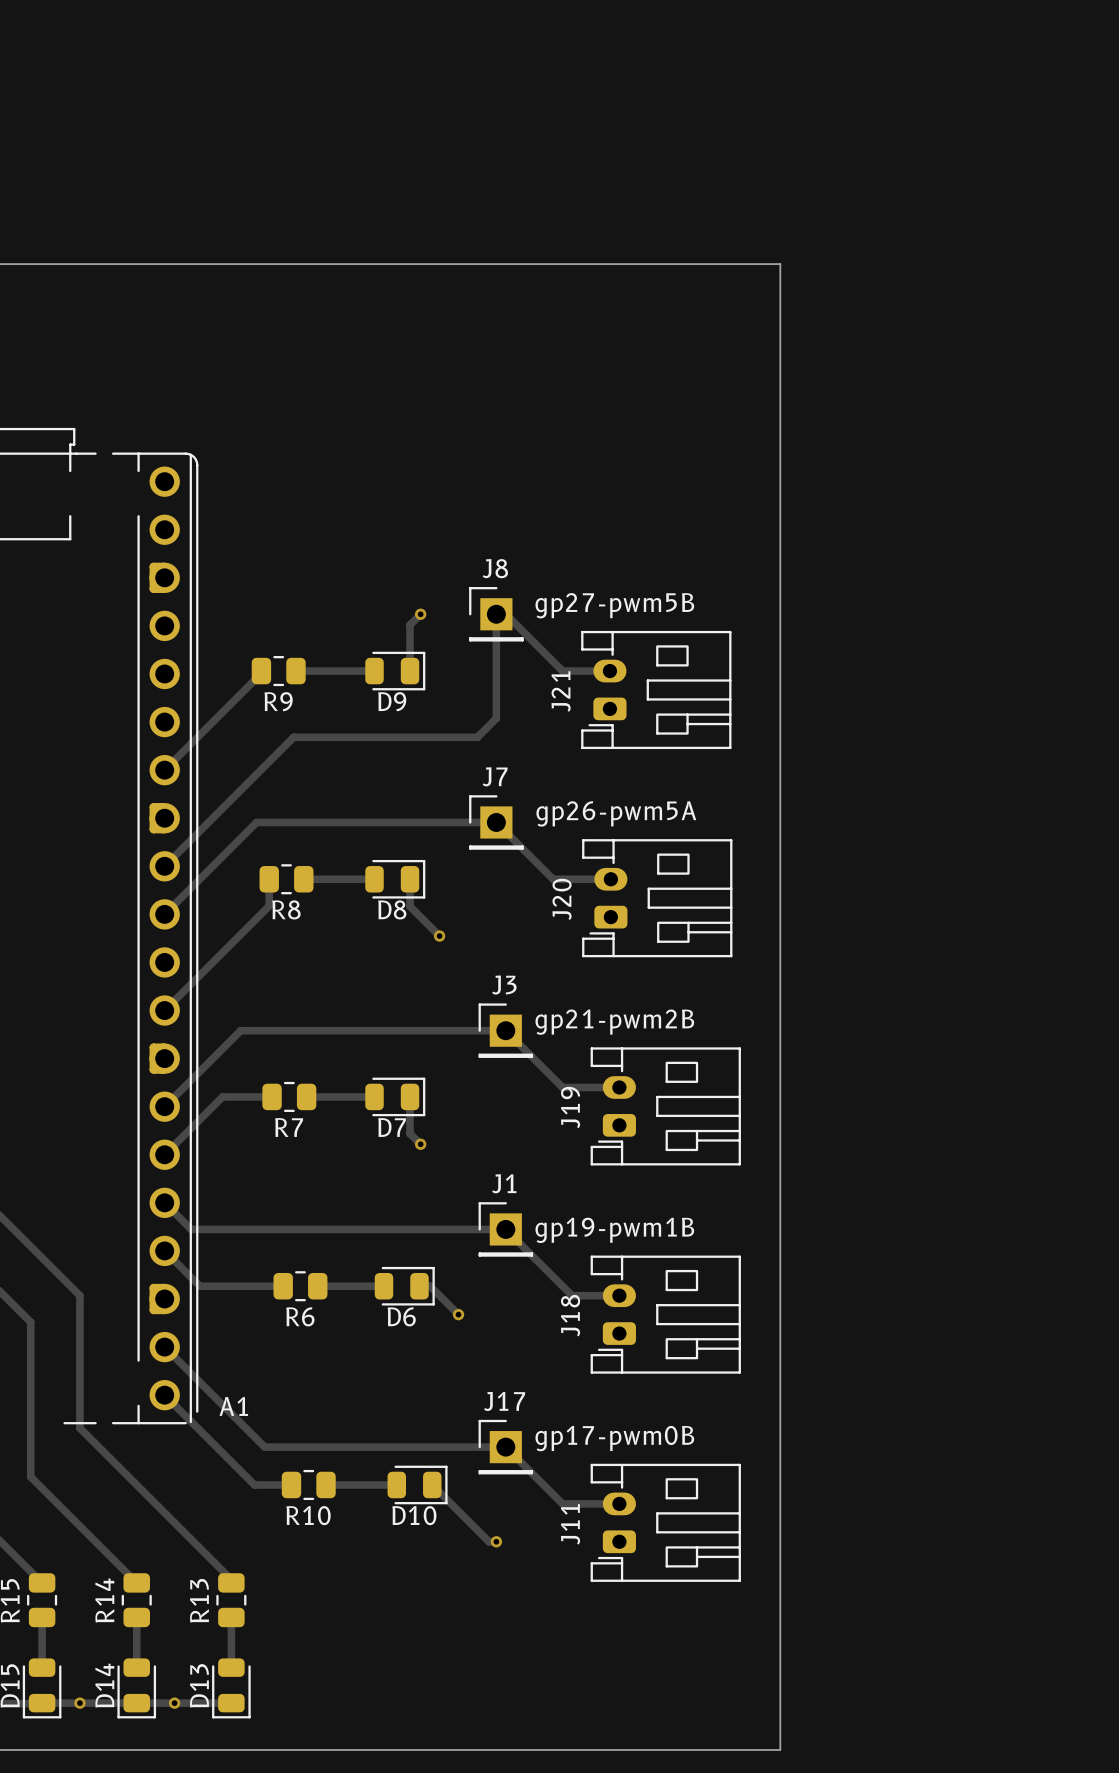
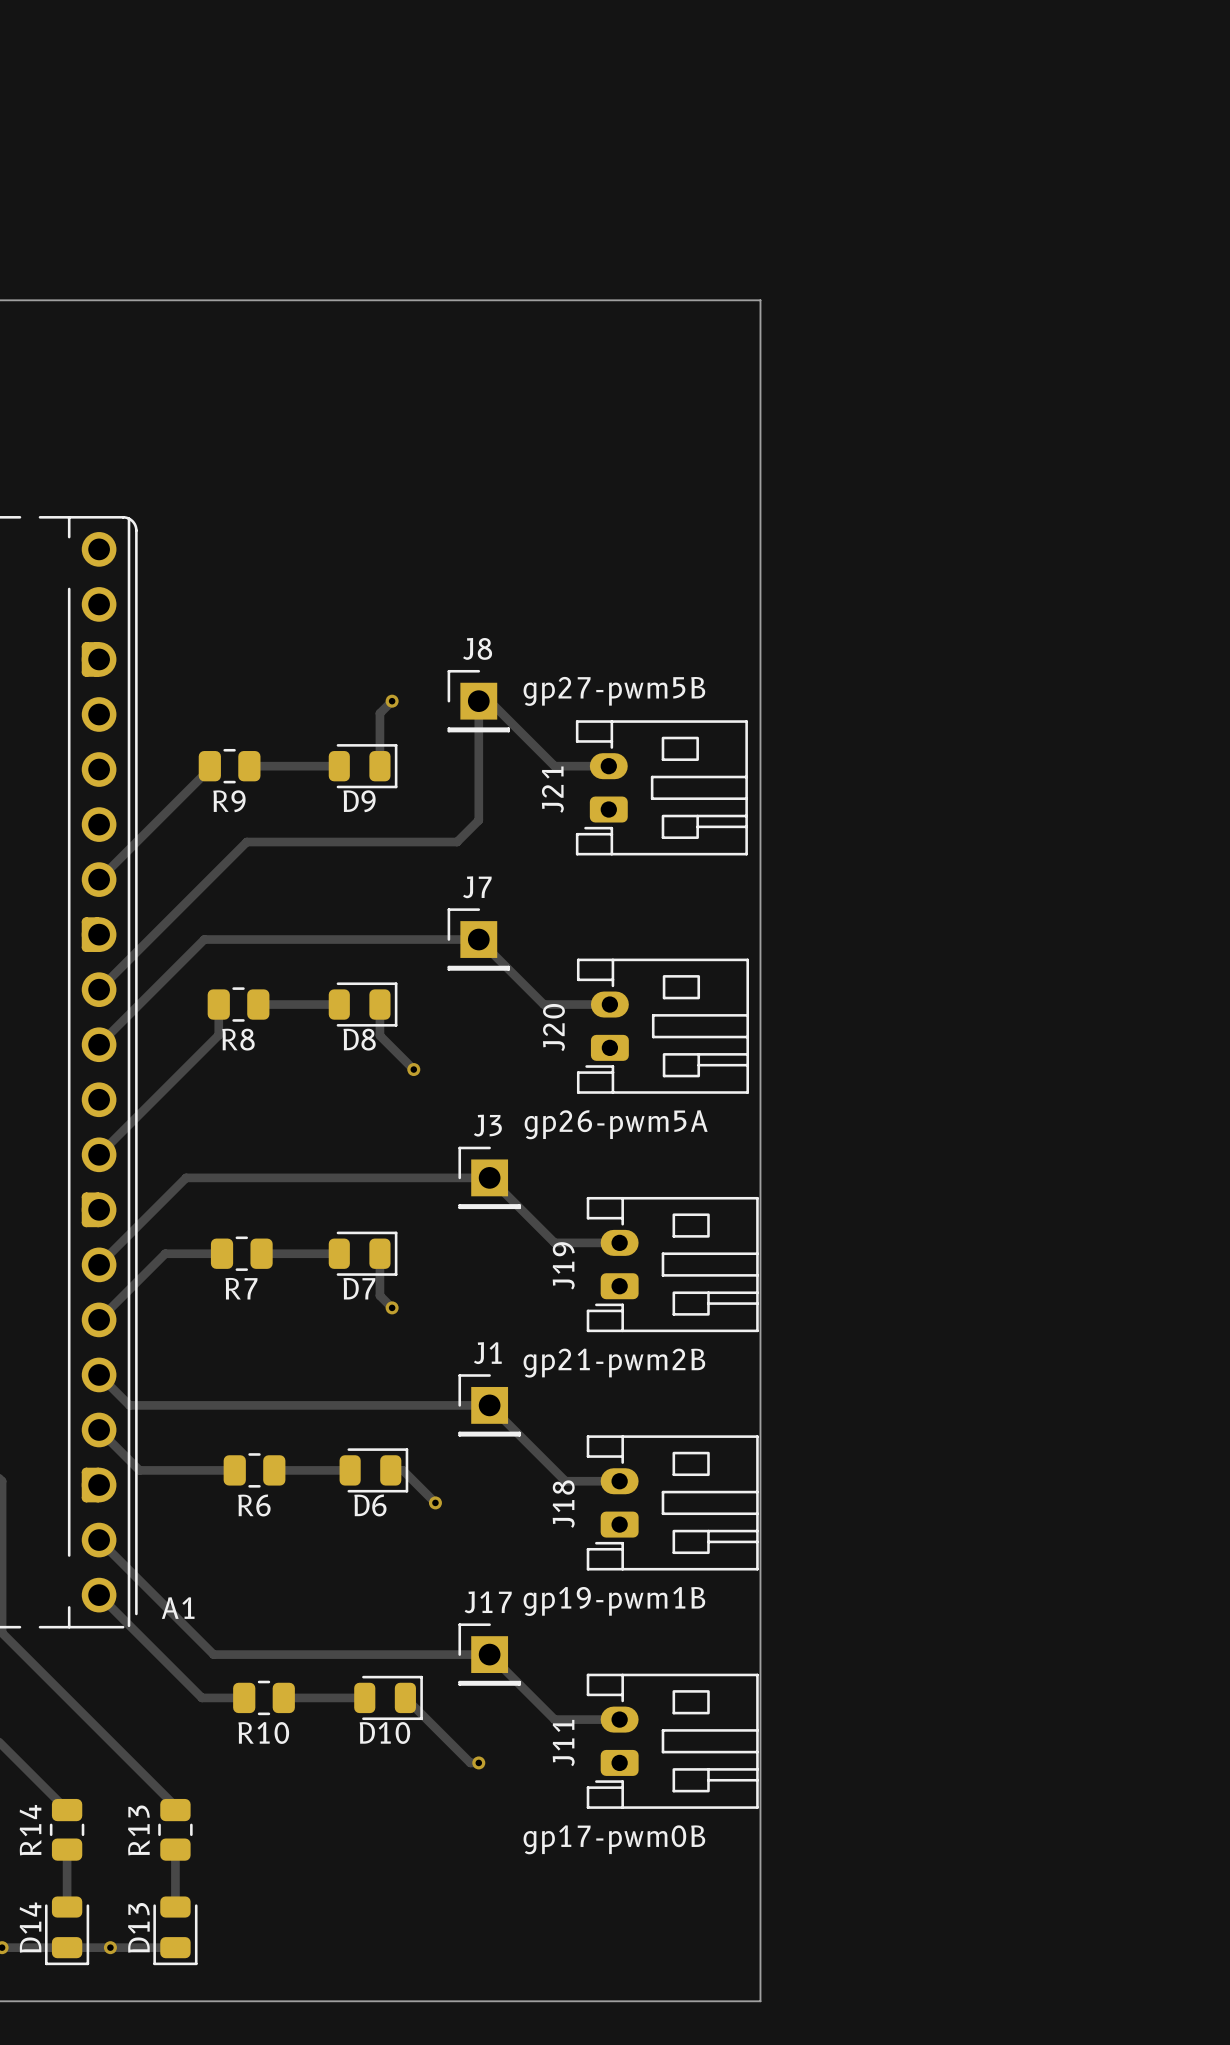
board edge: (742, 264) (780, 264) (780, 1749) (742, 1749) -> (760, 300) (760, 2001)
J20 value position: gp26-pwm5A (616, 813) -> gp26-pwm5A (616, 1124)
J19 value position: gp21-pwm2B (614, 1022) -> gp21-pwm2B (614, 1363)
J18 value position: gp19-pwm1B (614, 1230) -> gp19-pwm1B (614, 1601)
J11 value position: gp17-pwm0B (614, 1438) -> gp17-pwm0B (614, 1839)

